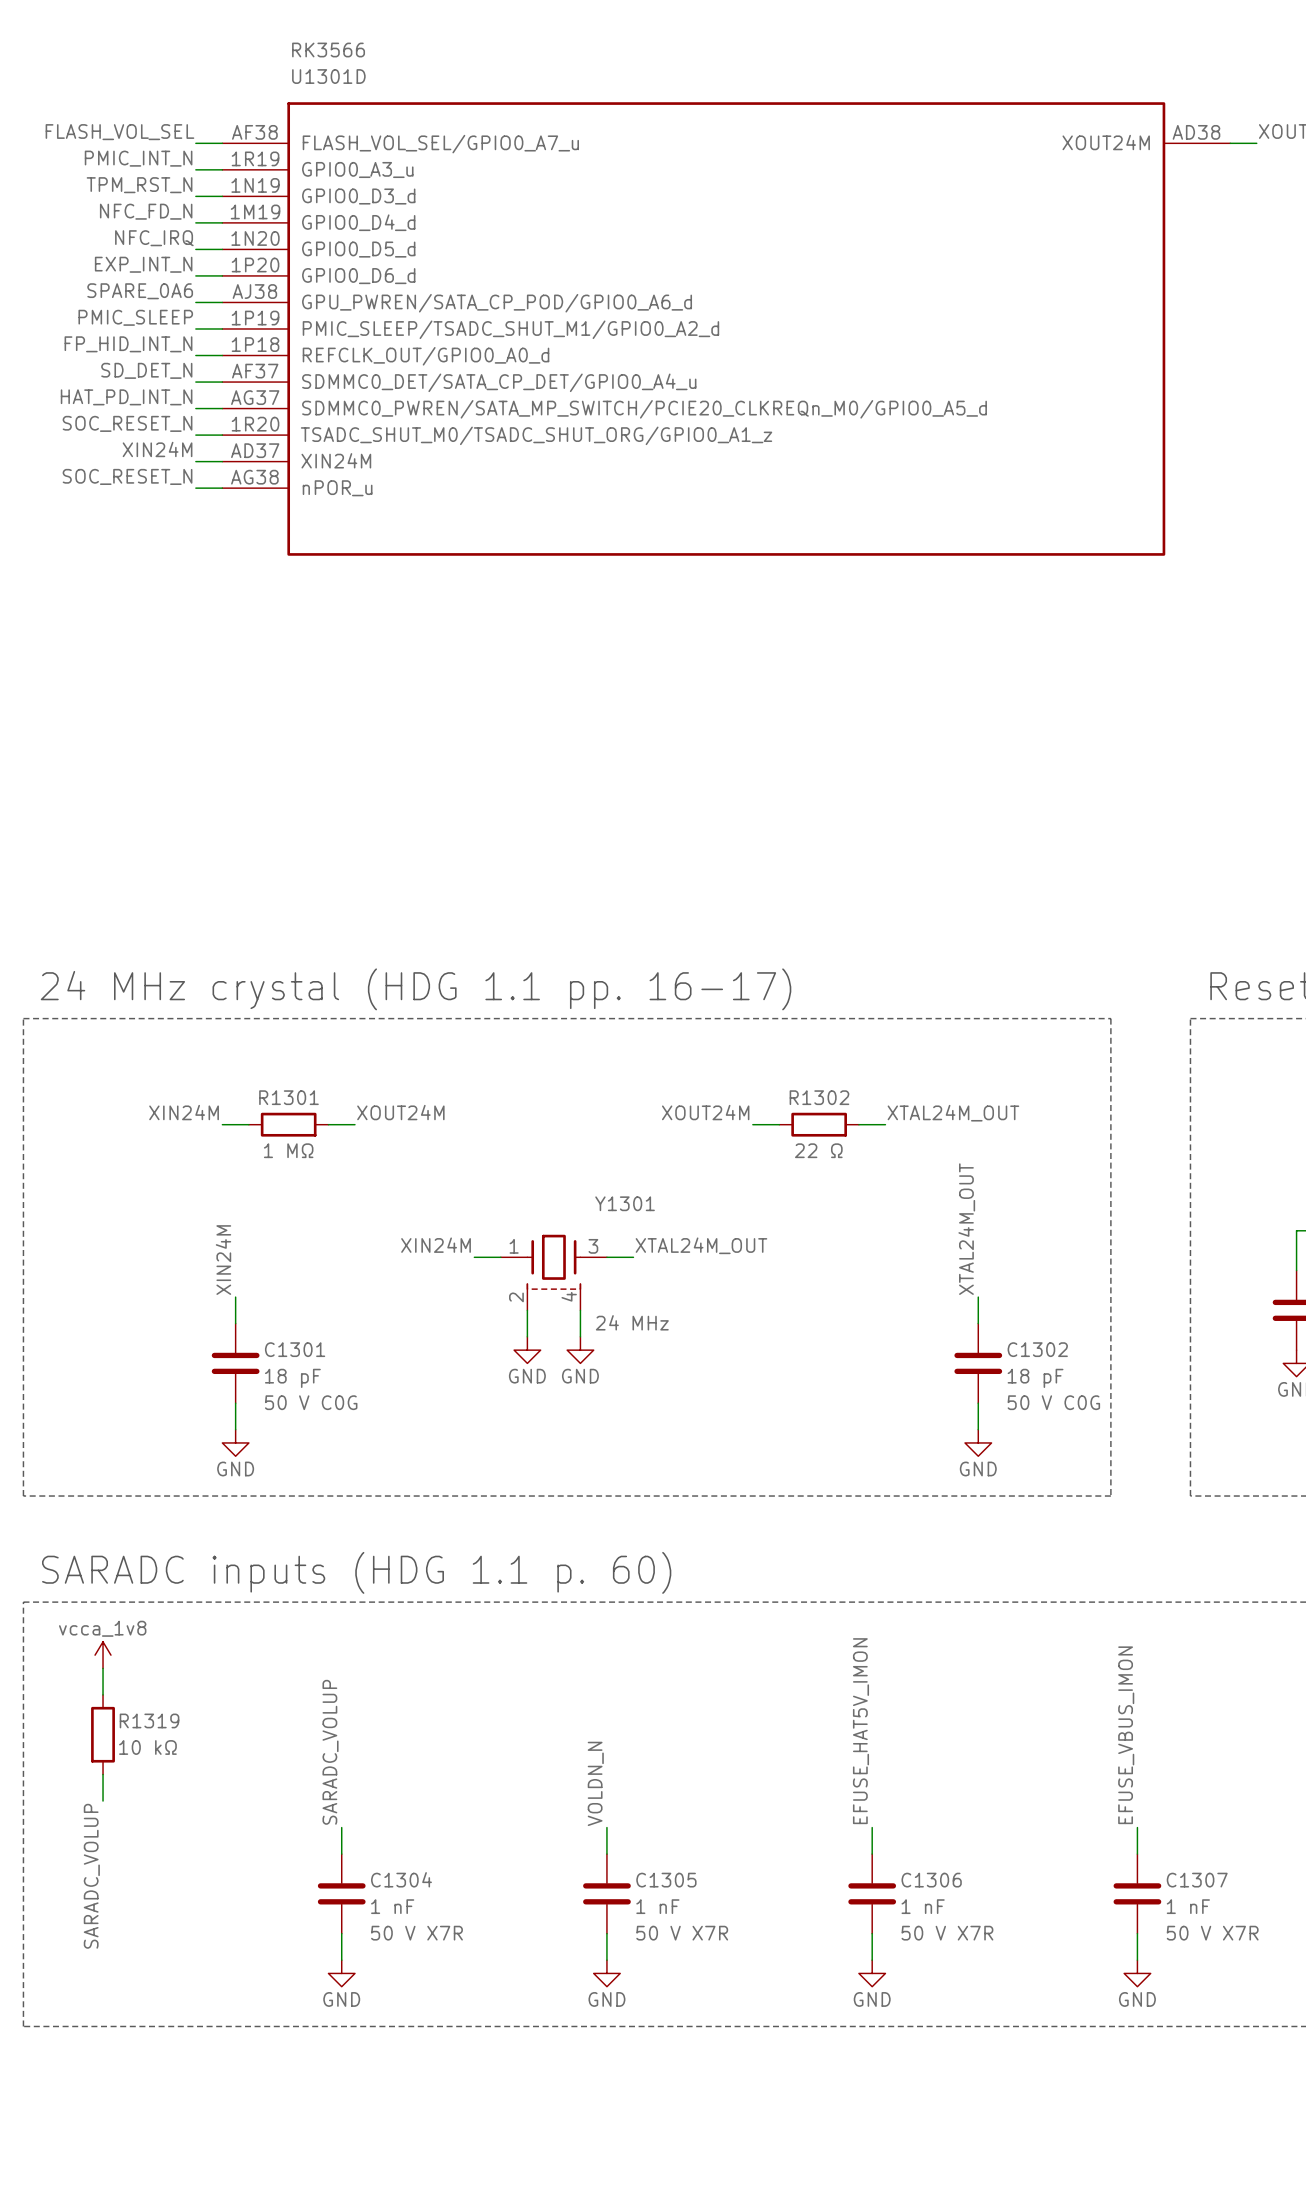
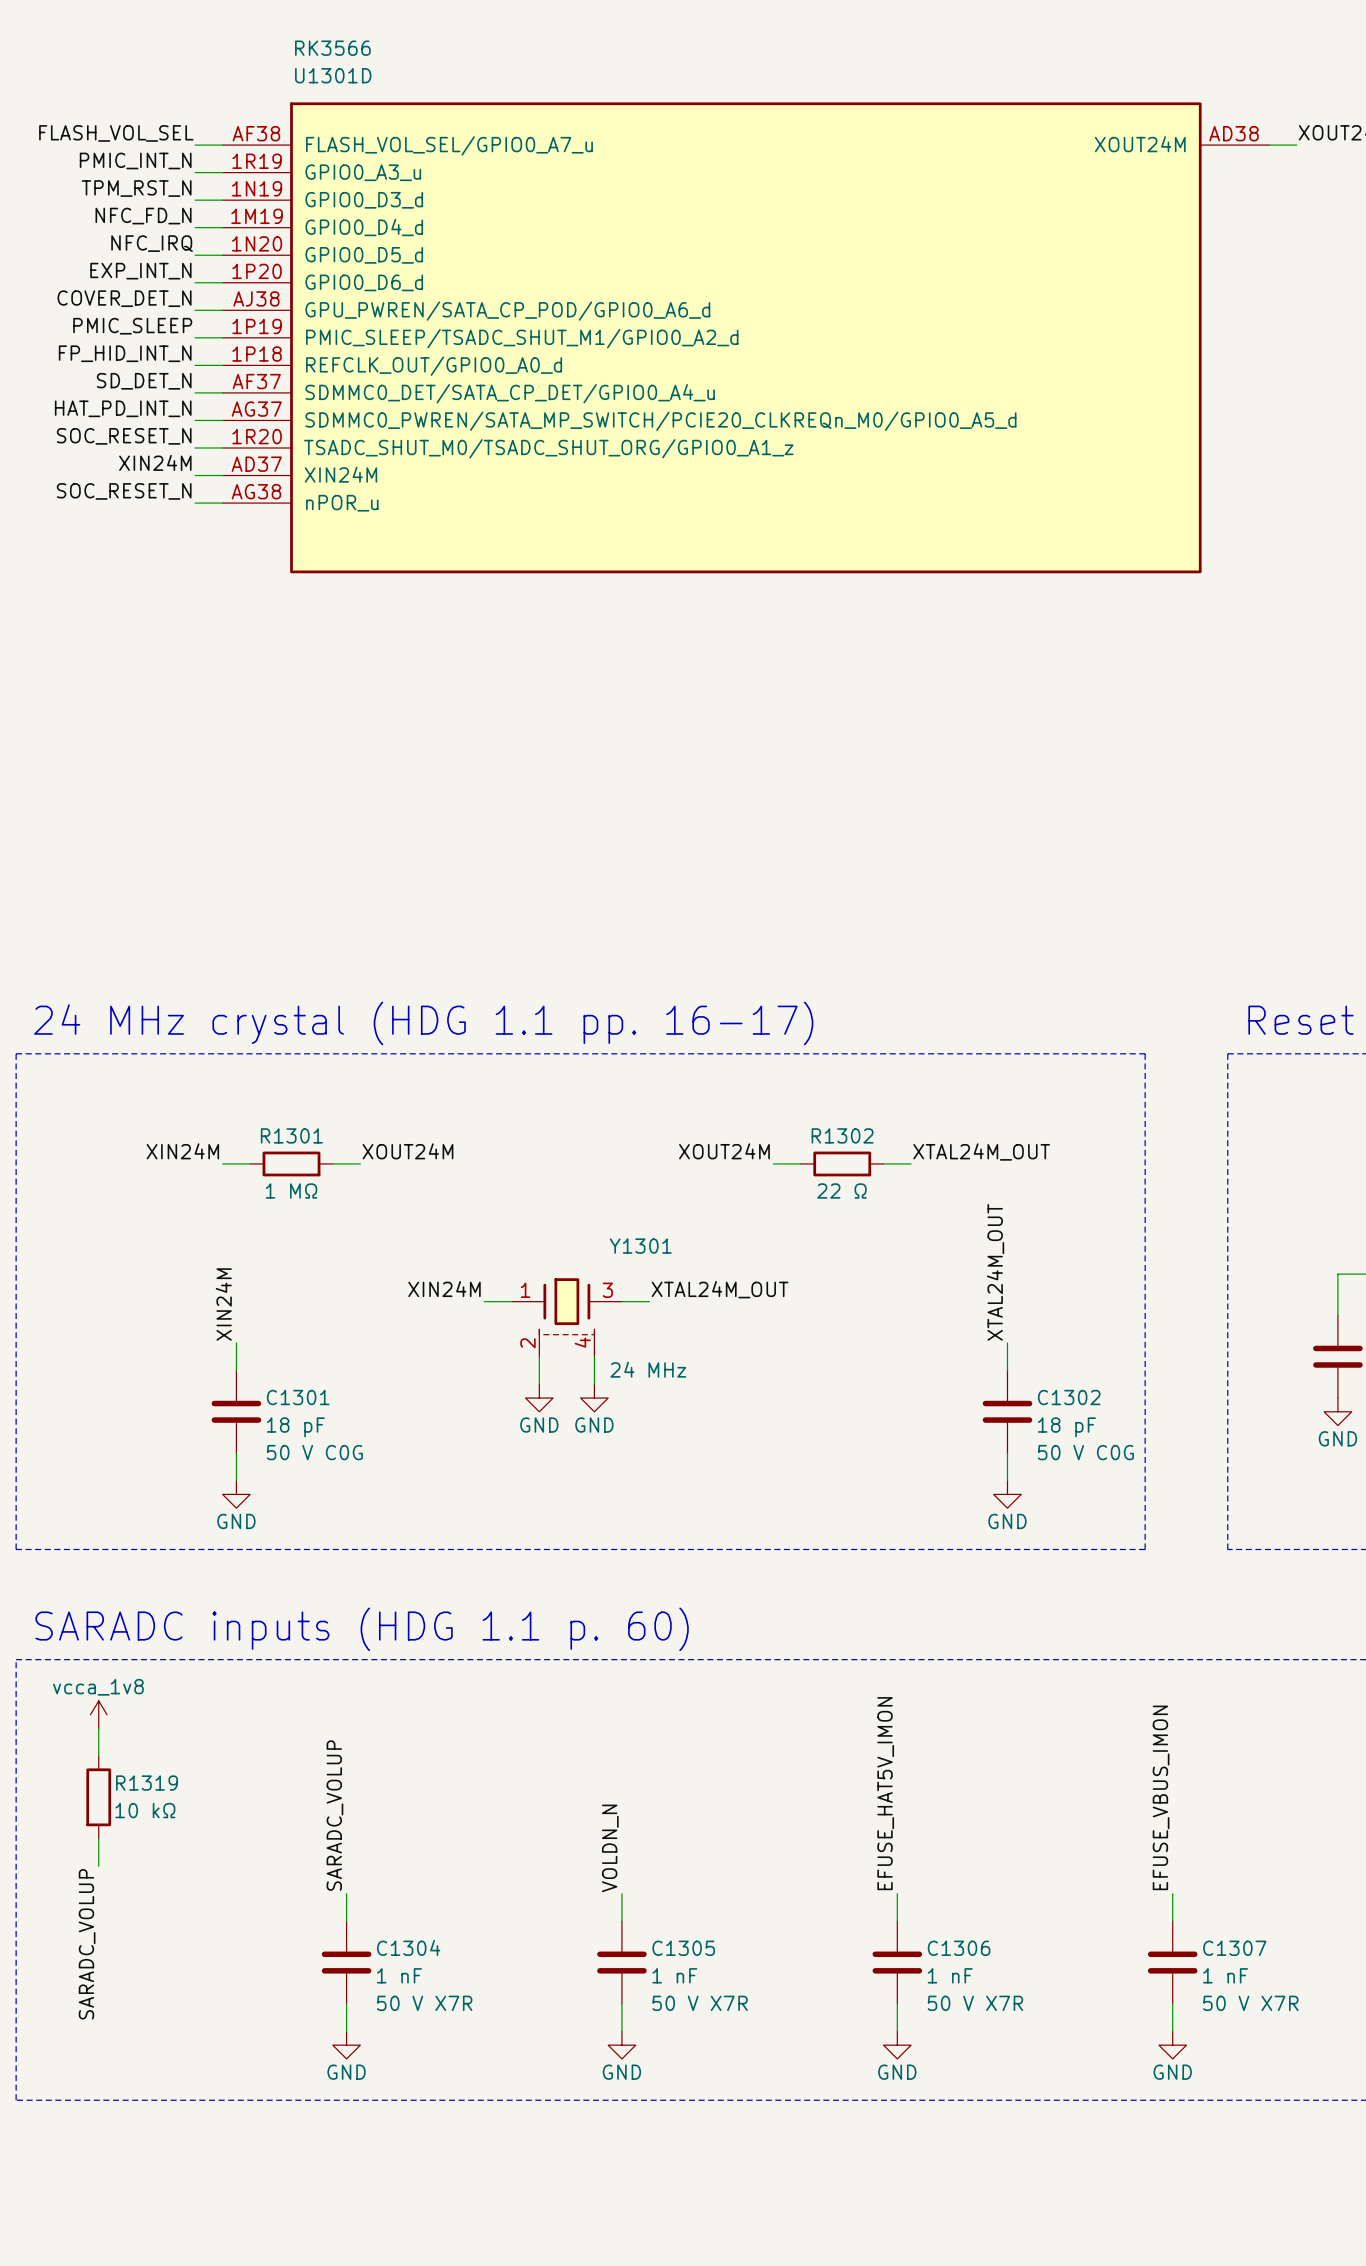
label: SPARE_0A6 (140, 291) -> COVER_DET_N (124, 298)

